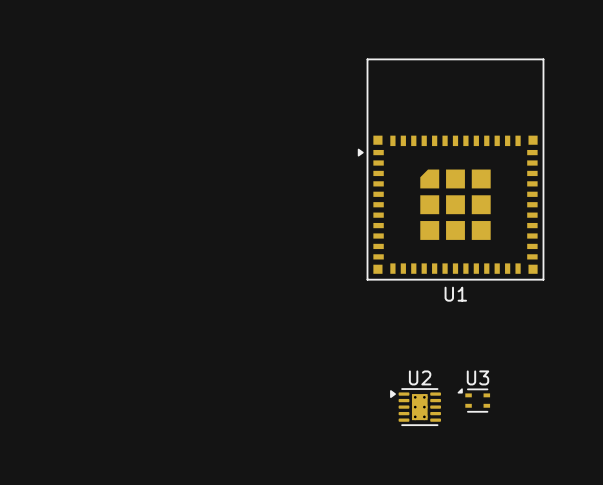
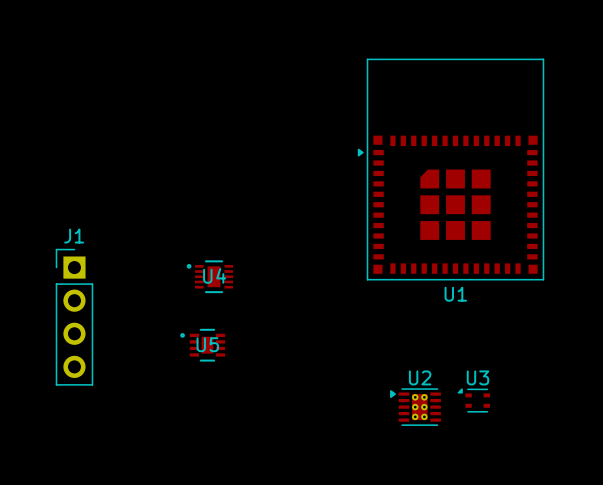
U4: none -> (209, 276)
J1: none -> (74, 317)
U5: none -> (202, 345)

